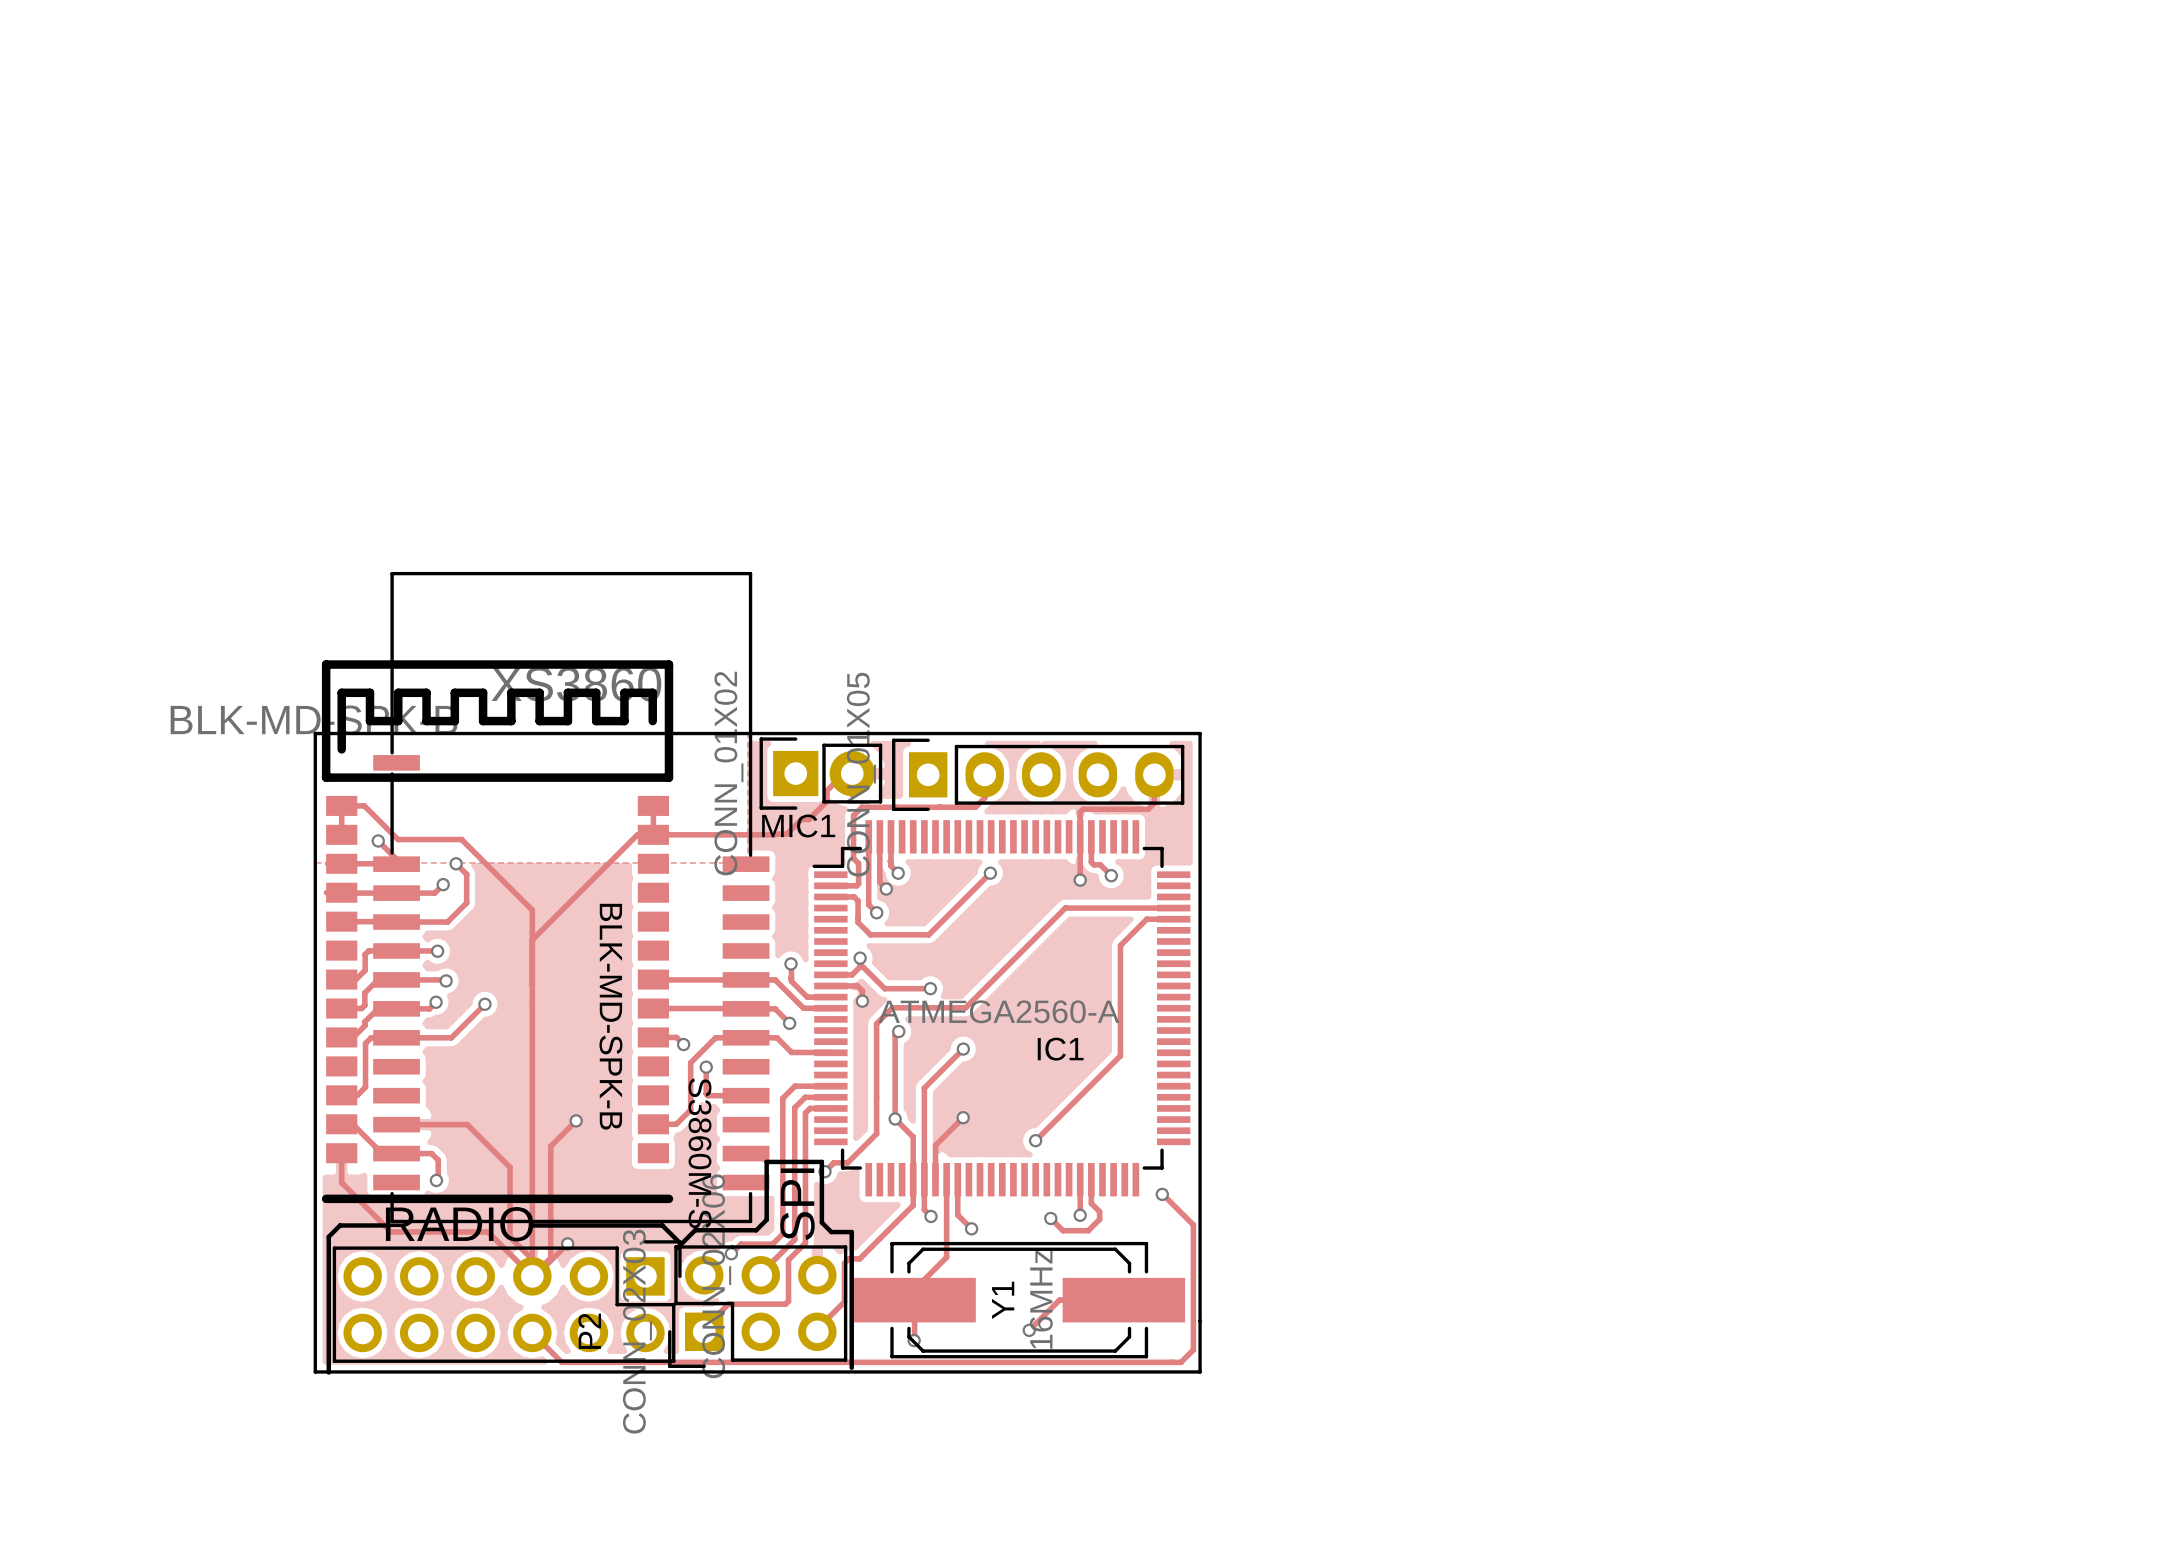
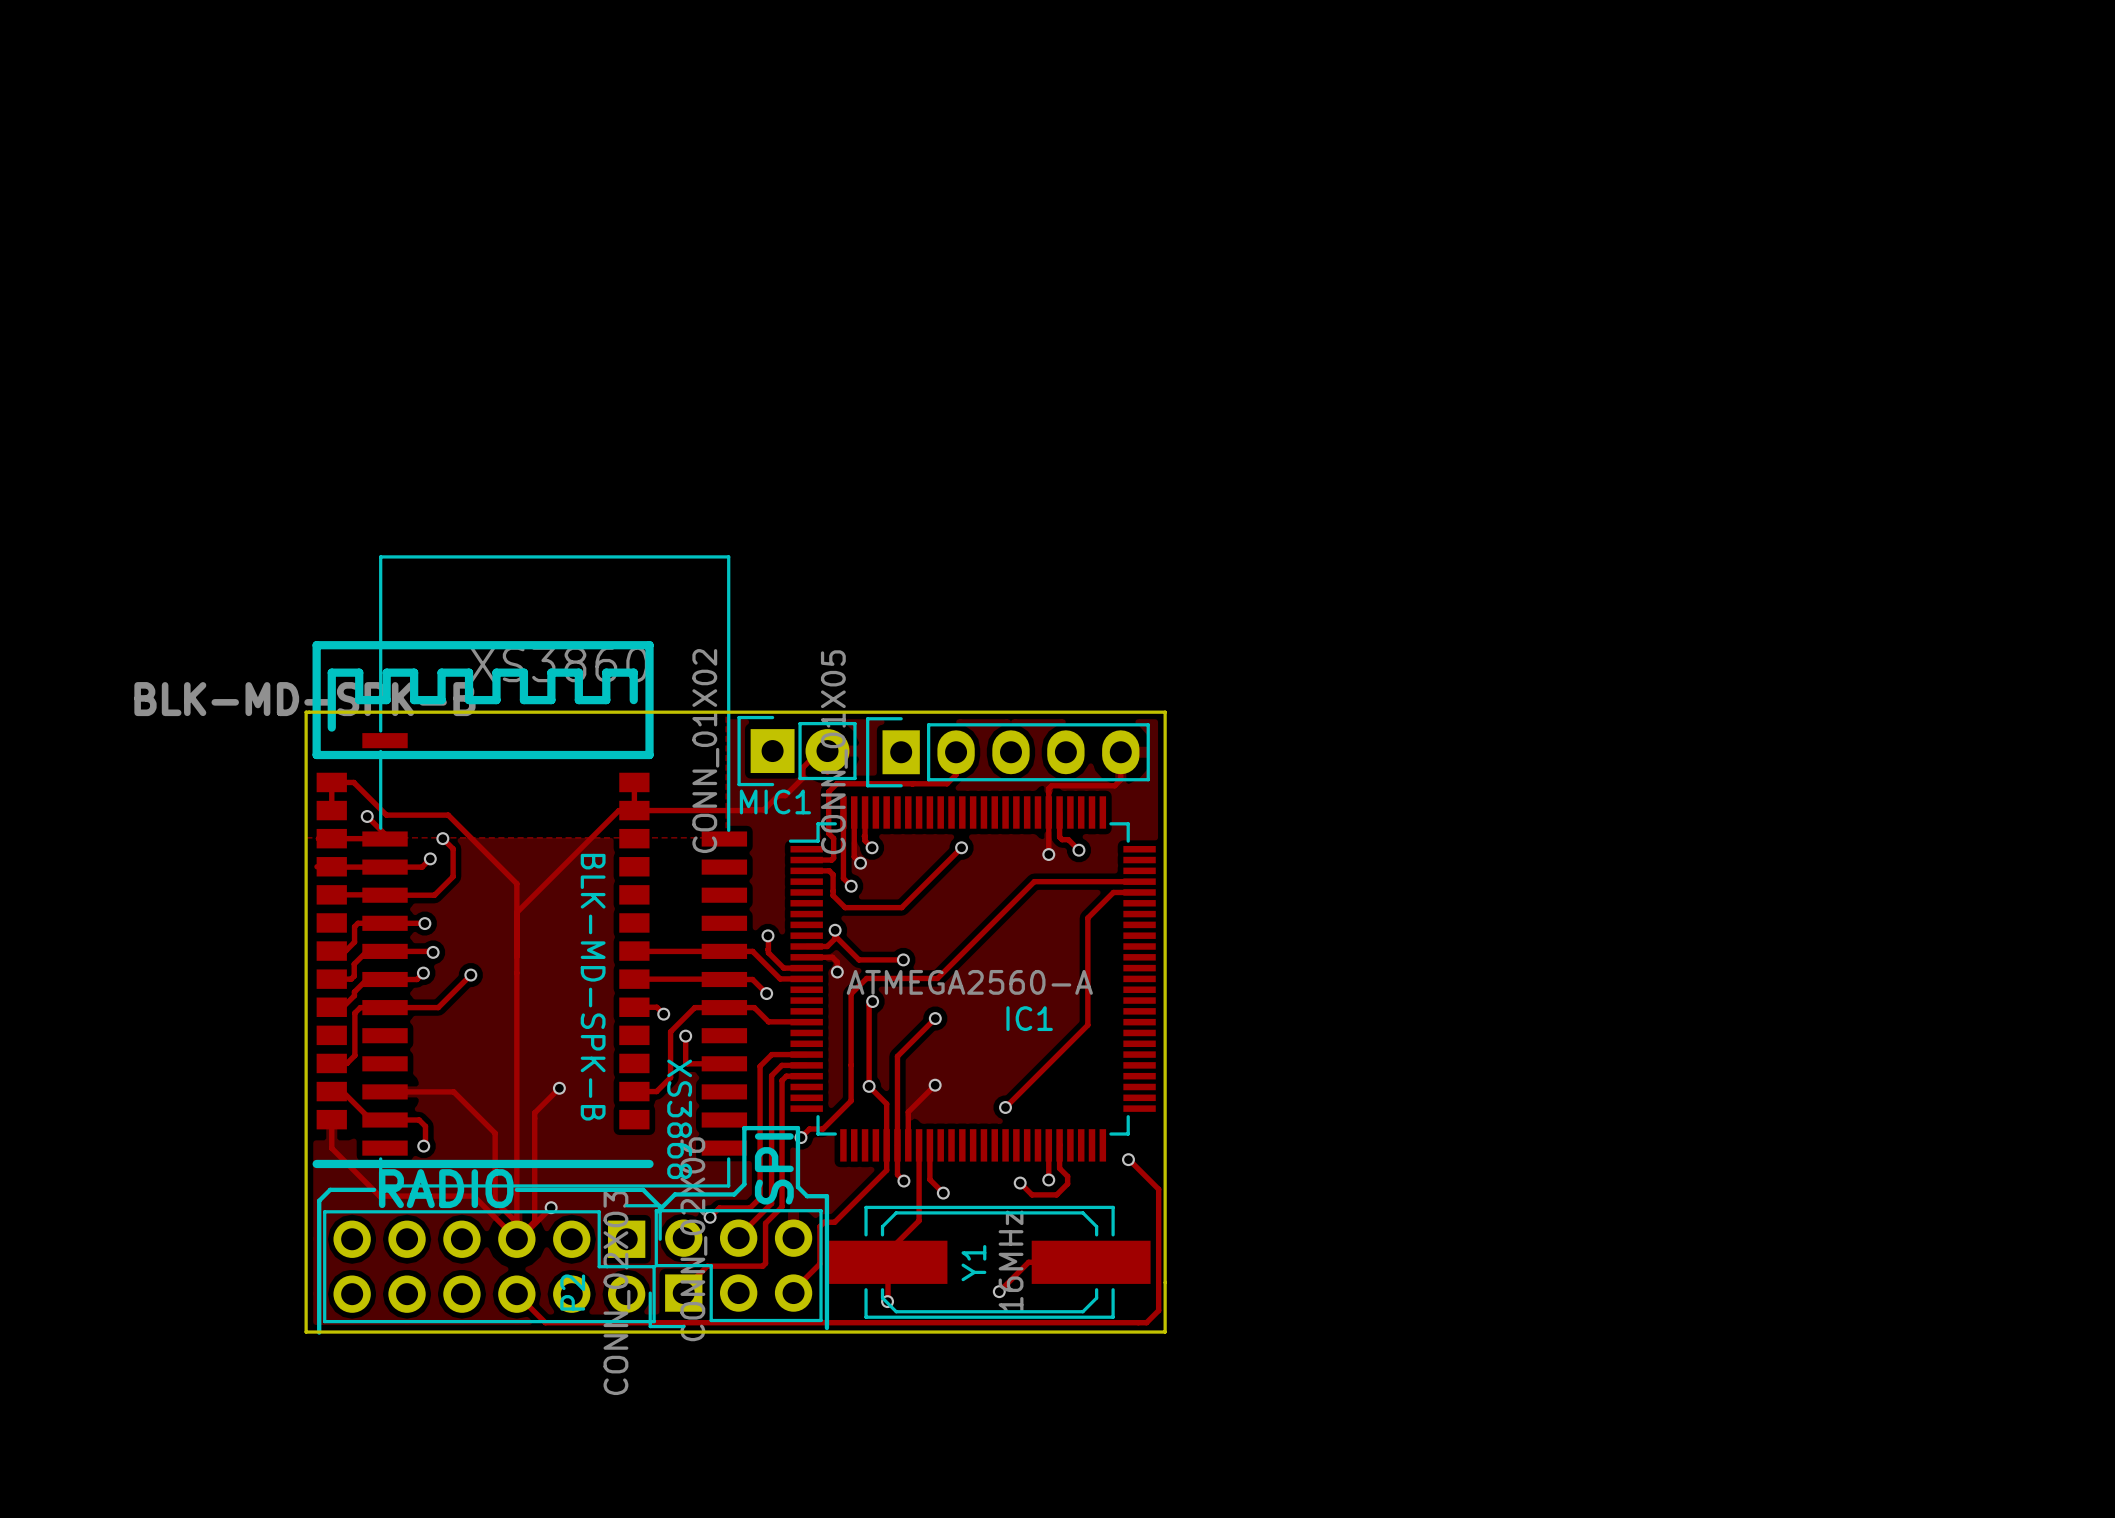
text: S3860M-S (700, 1153) -> XS3868 (679, 1119)

